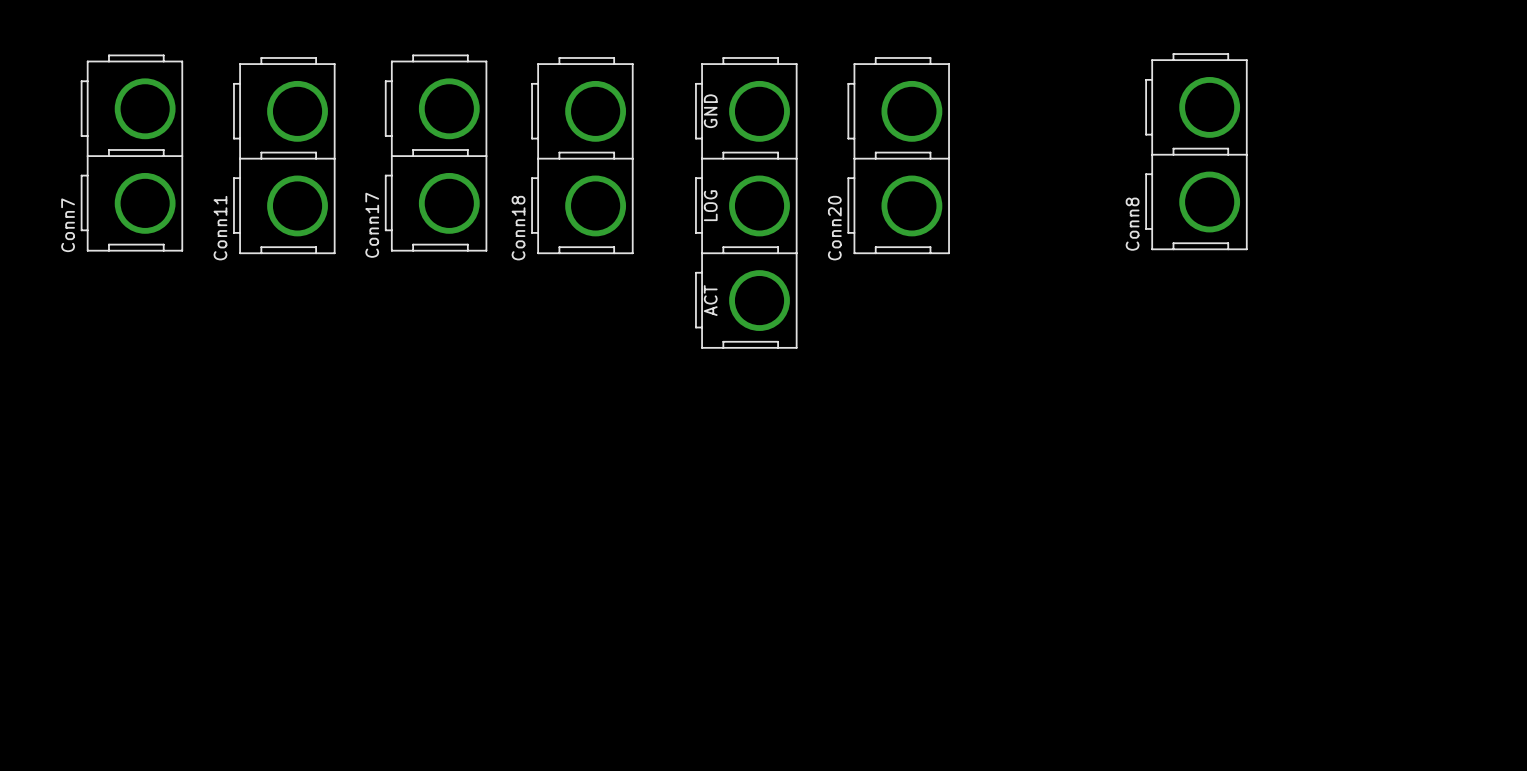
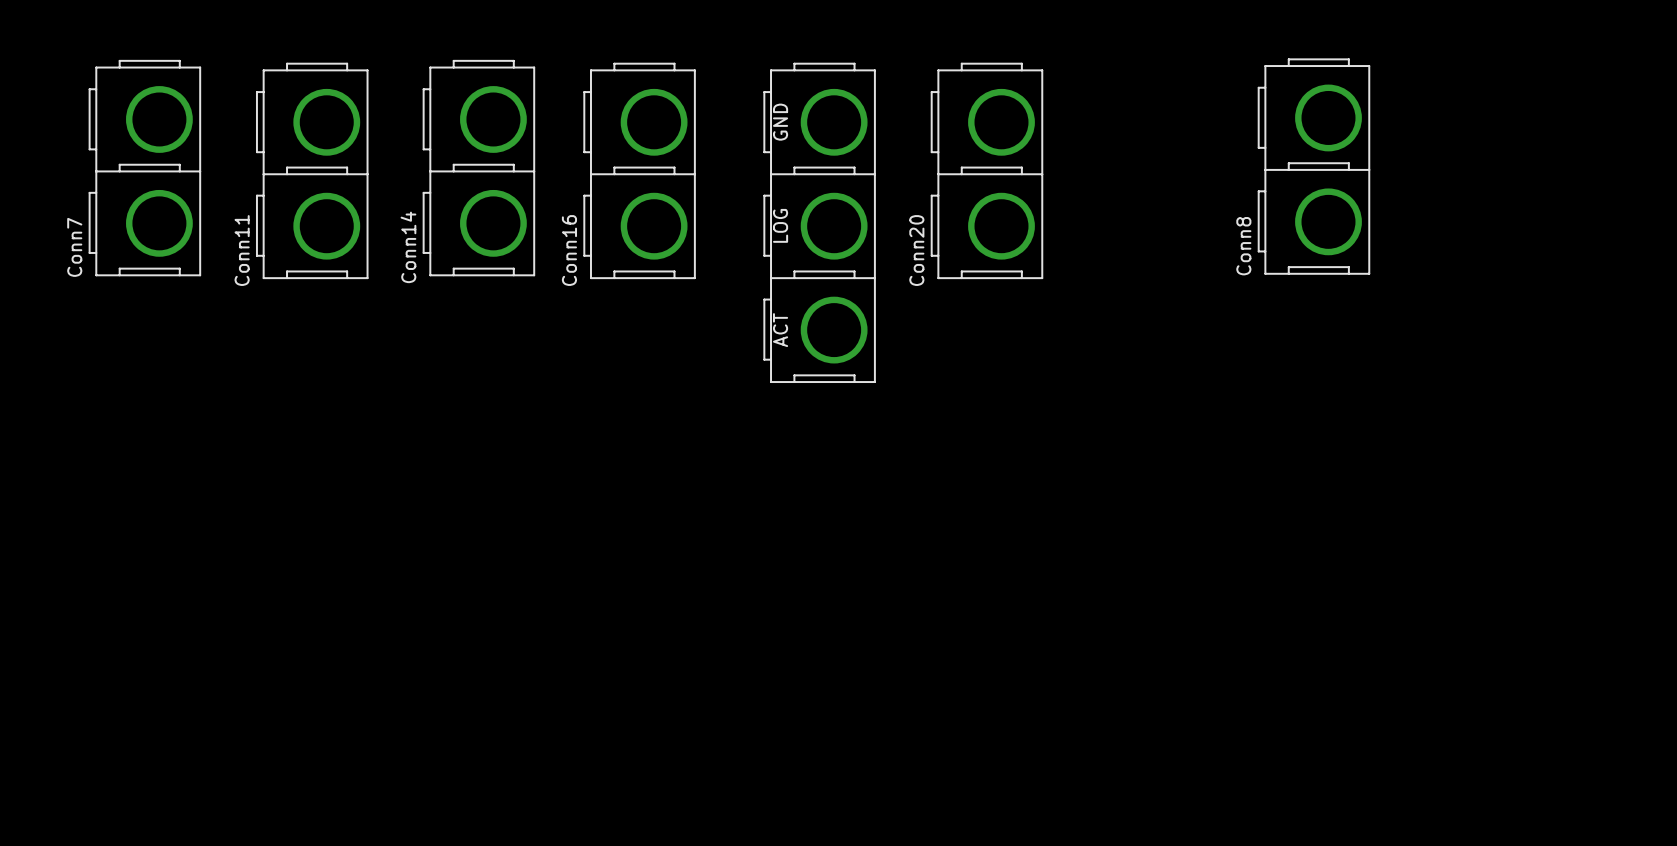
Conn17 name: Conn17 (372, 225) -> Conn14 (408, 247)
Conn18 name: Conn18 (518, 228) -> Conn16 (569, 250)

